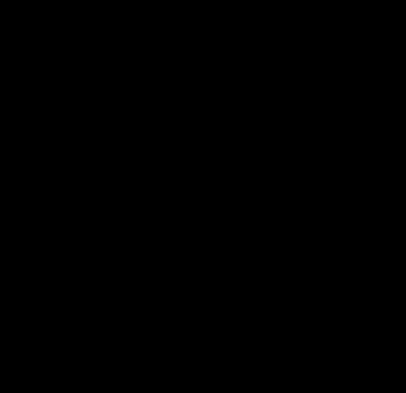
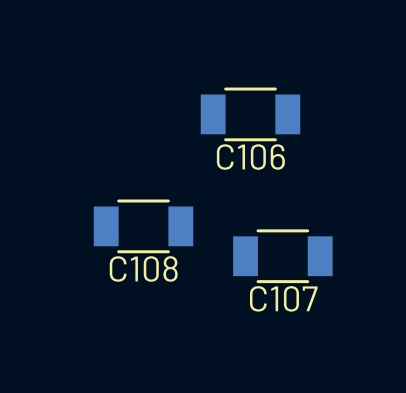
C106: none -> (250, 114)
C108: none -> (143, 226)
C107: none -> (282, 256)

